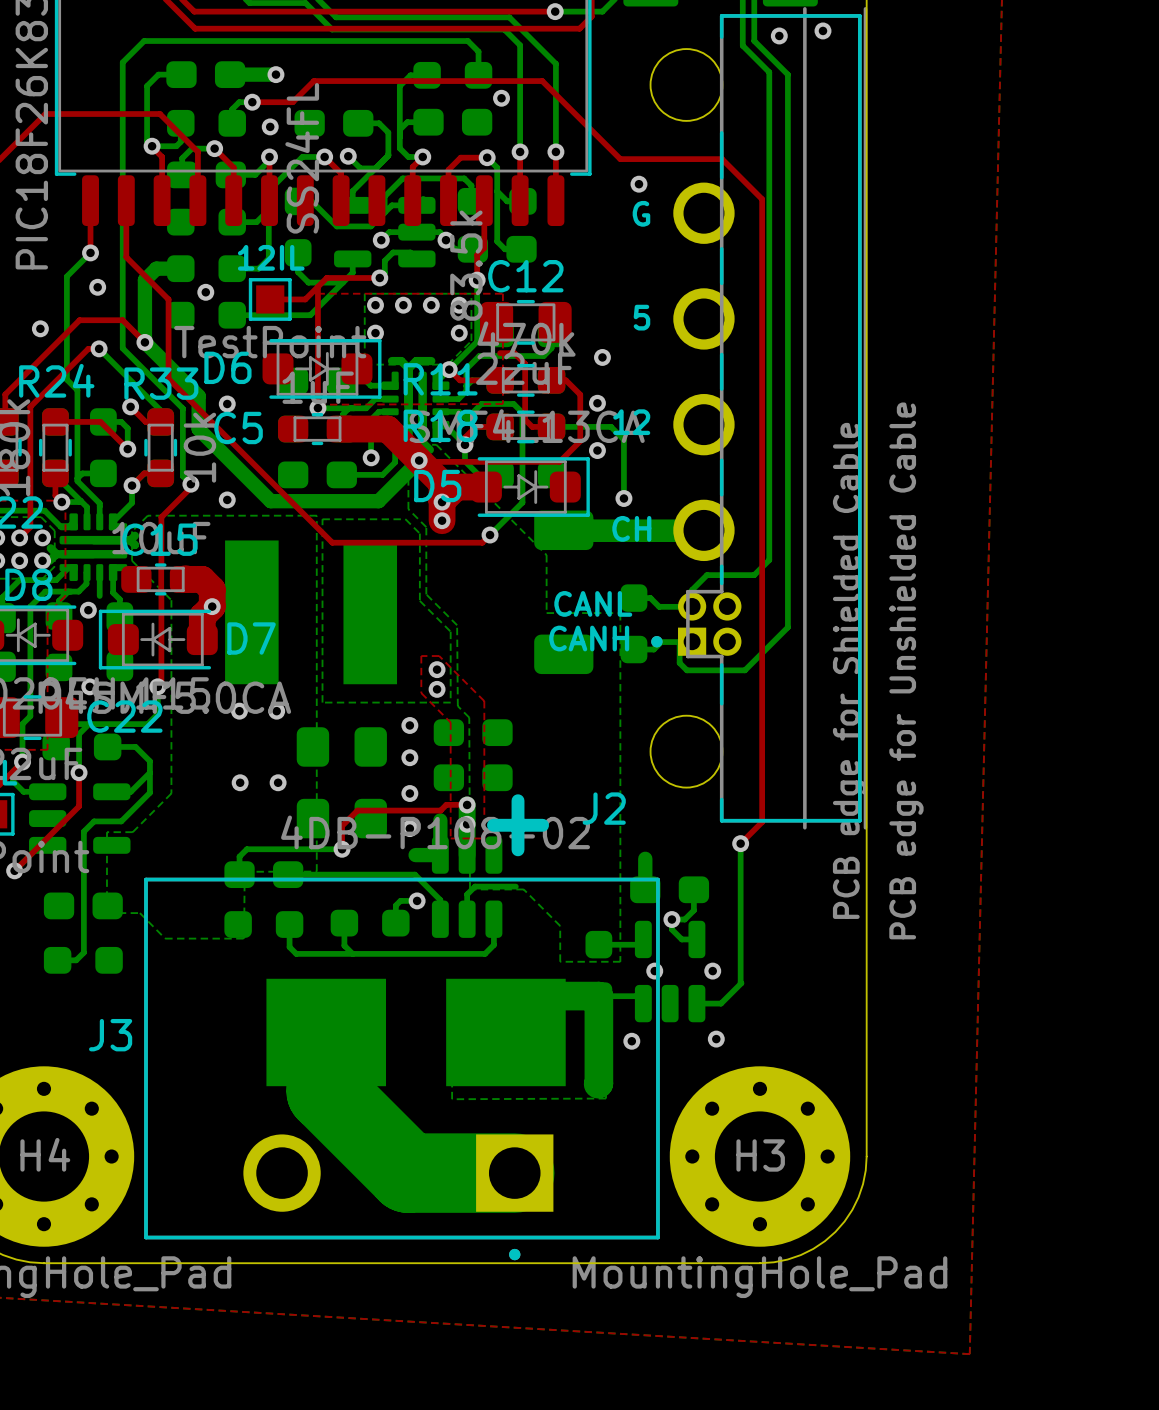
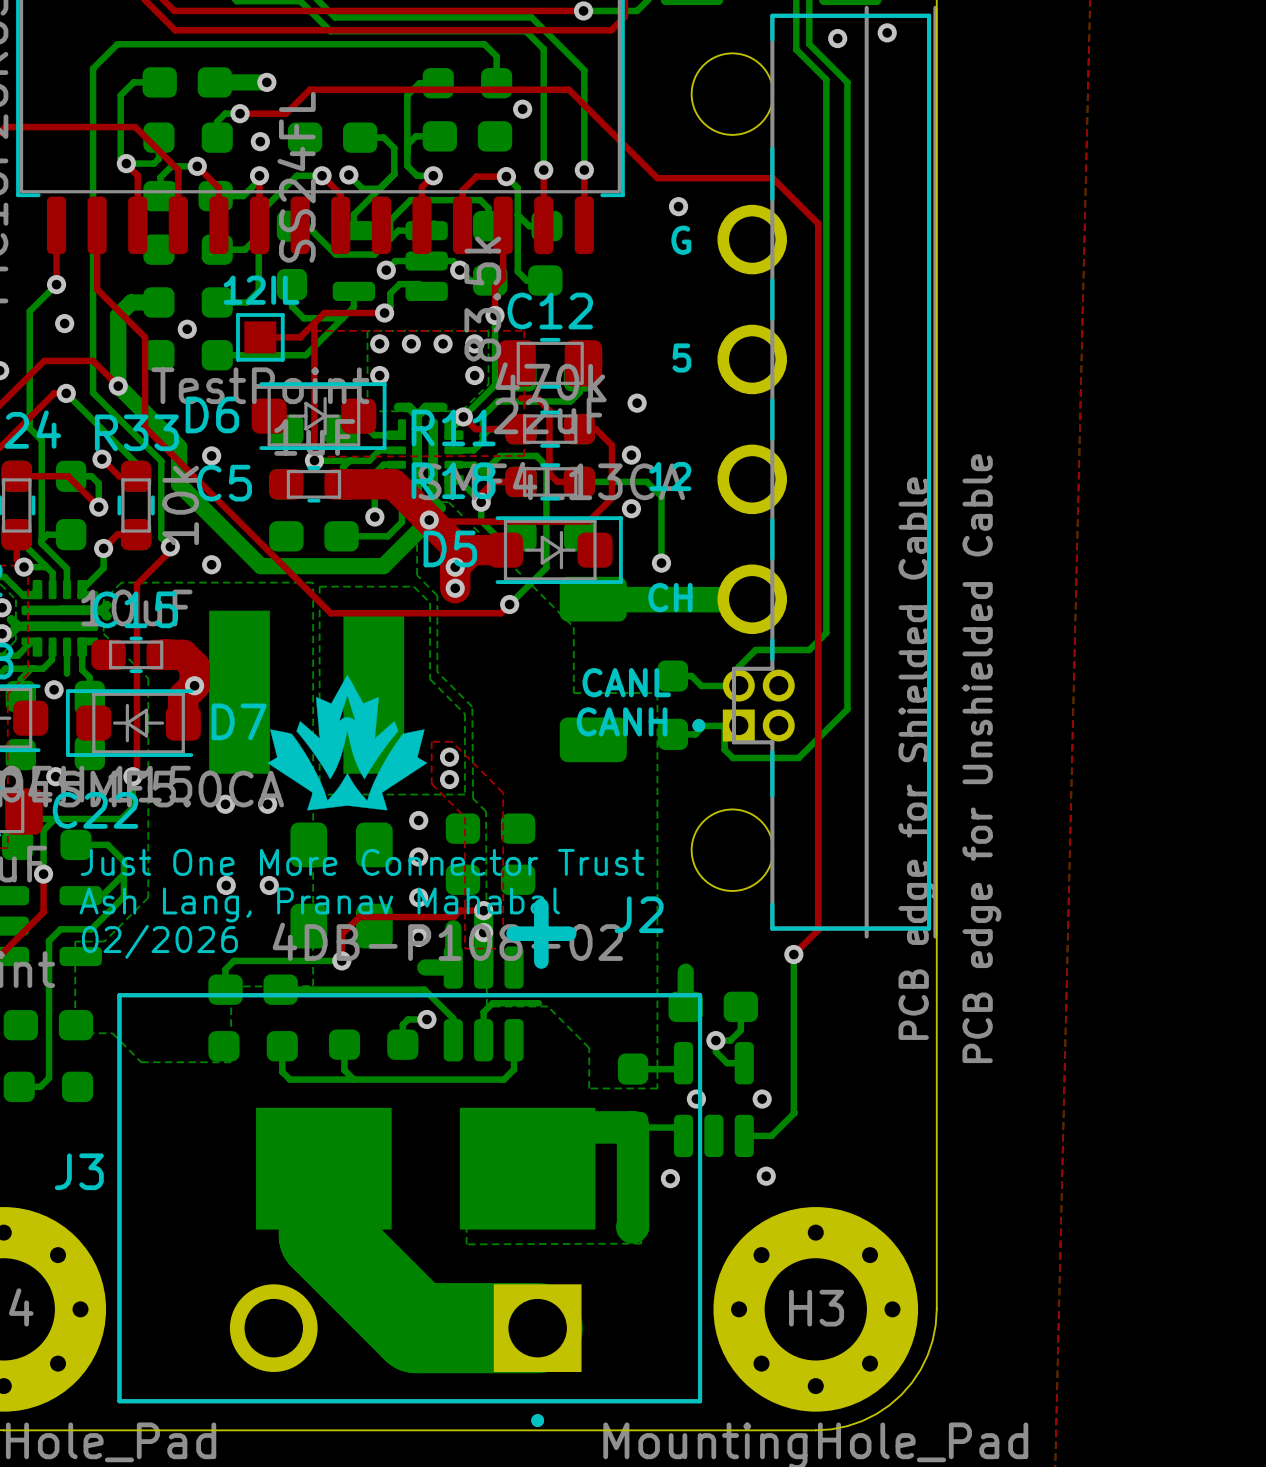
drawing: none -> [267, 675, 428, 811]
text: none -> Just One More Connector Trust (362, 862)
text: none -> Ash Lang, Pranav Mahabal (319, 904)
text: none -> 02/2026 (159, 941)

